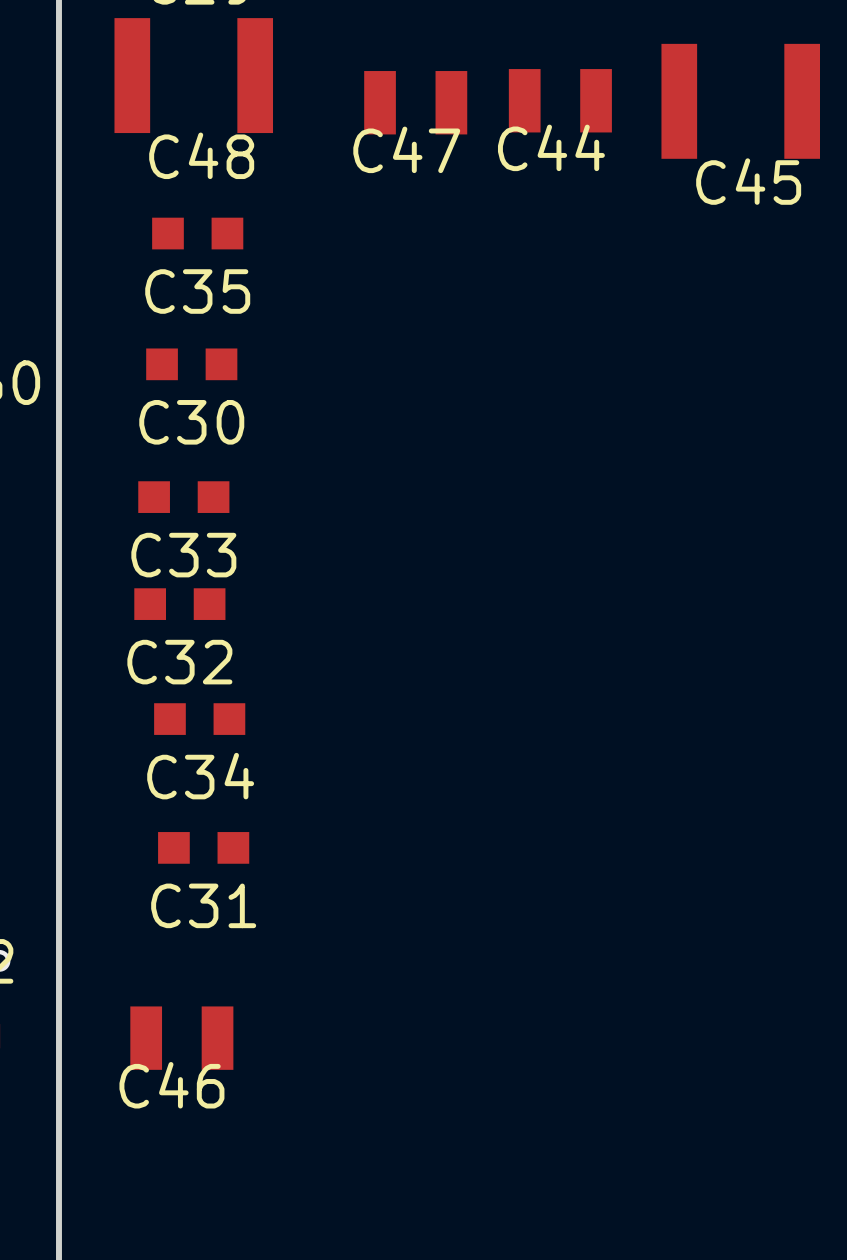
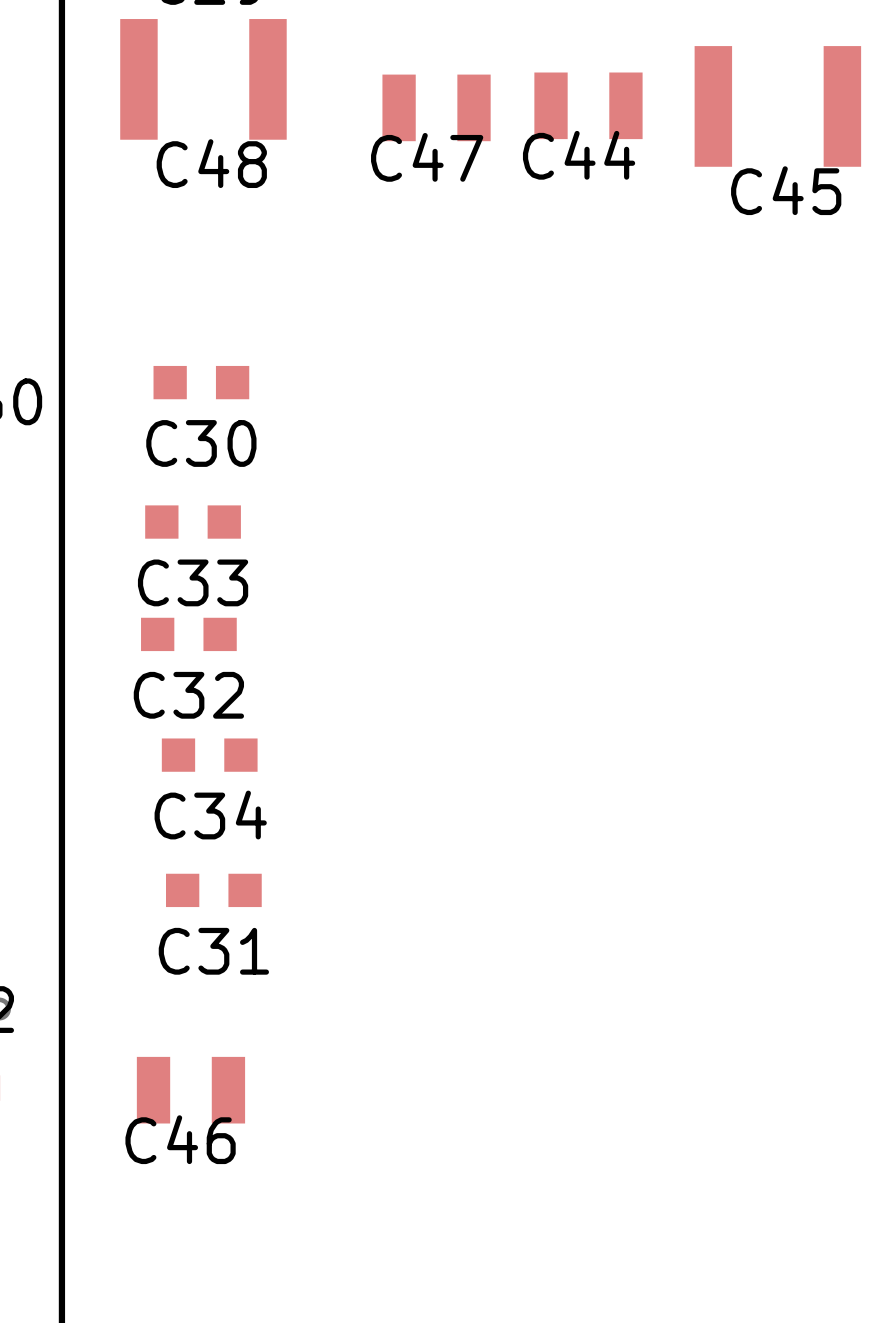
C35: (197, 233) -> none

